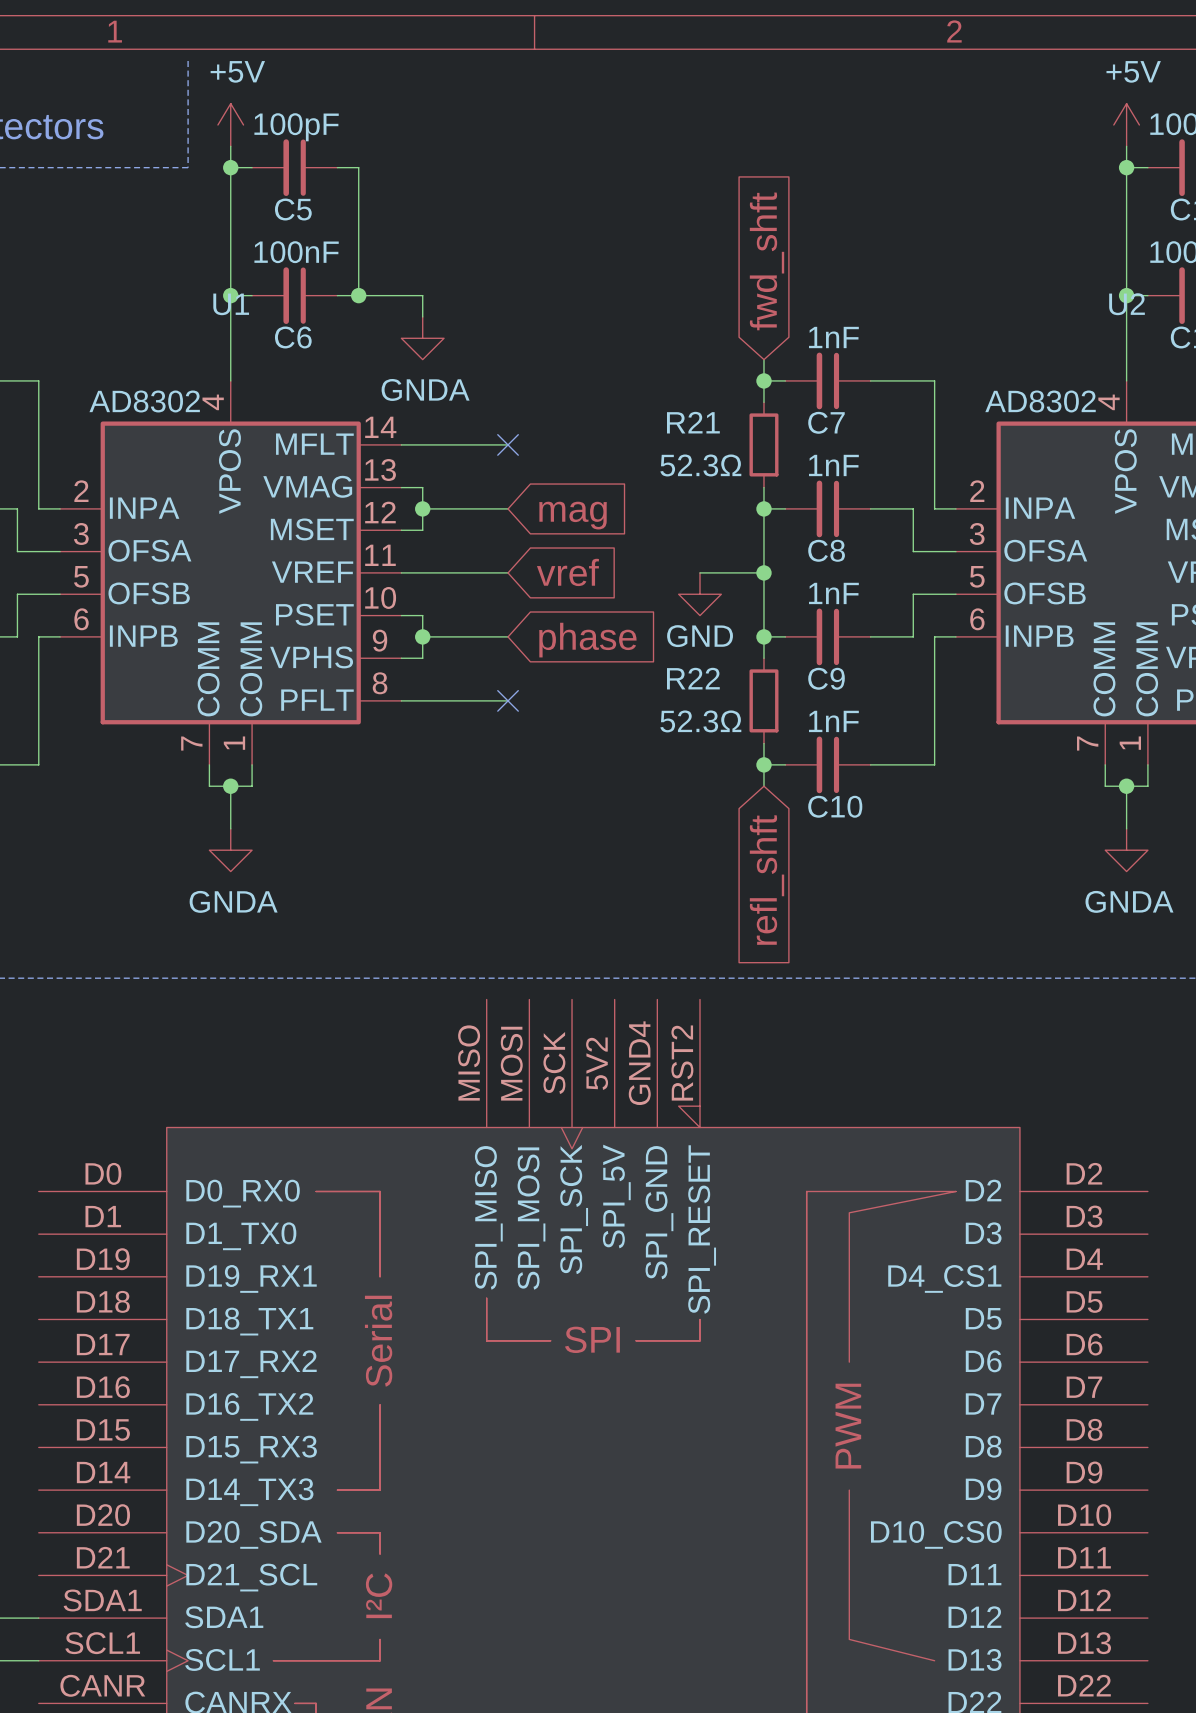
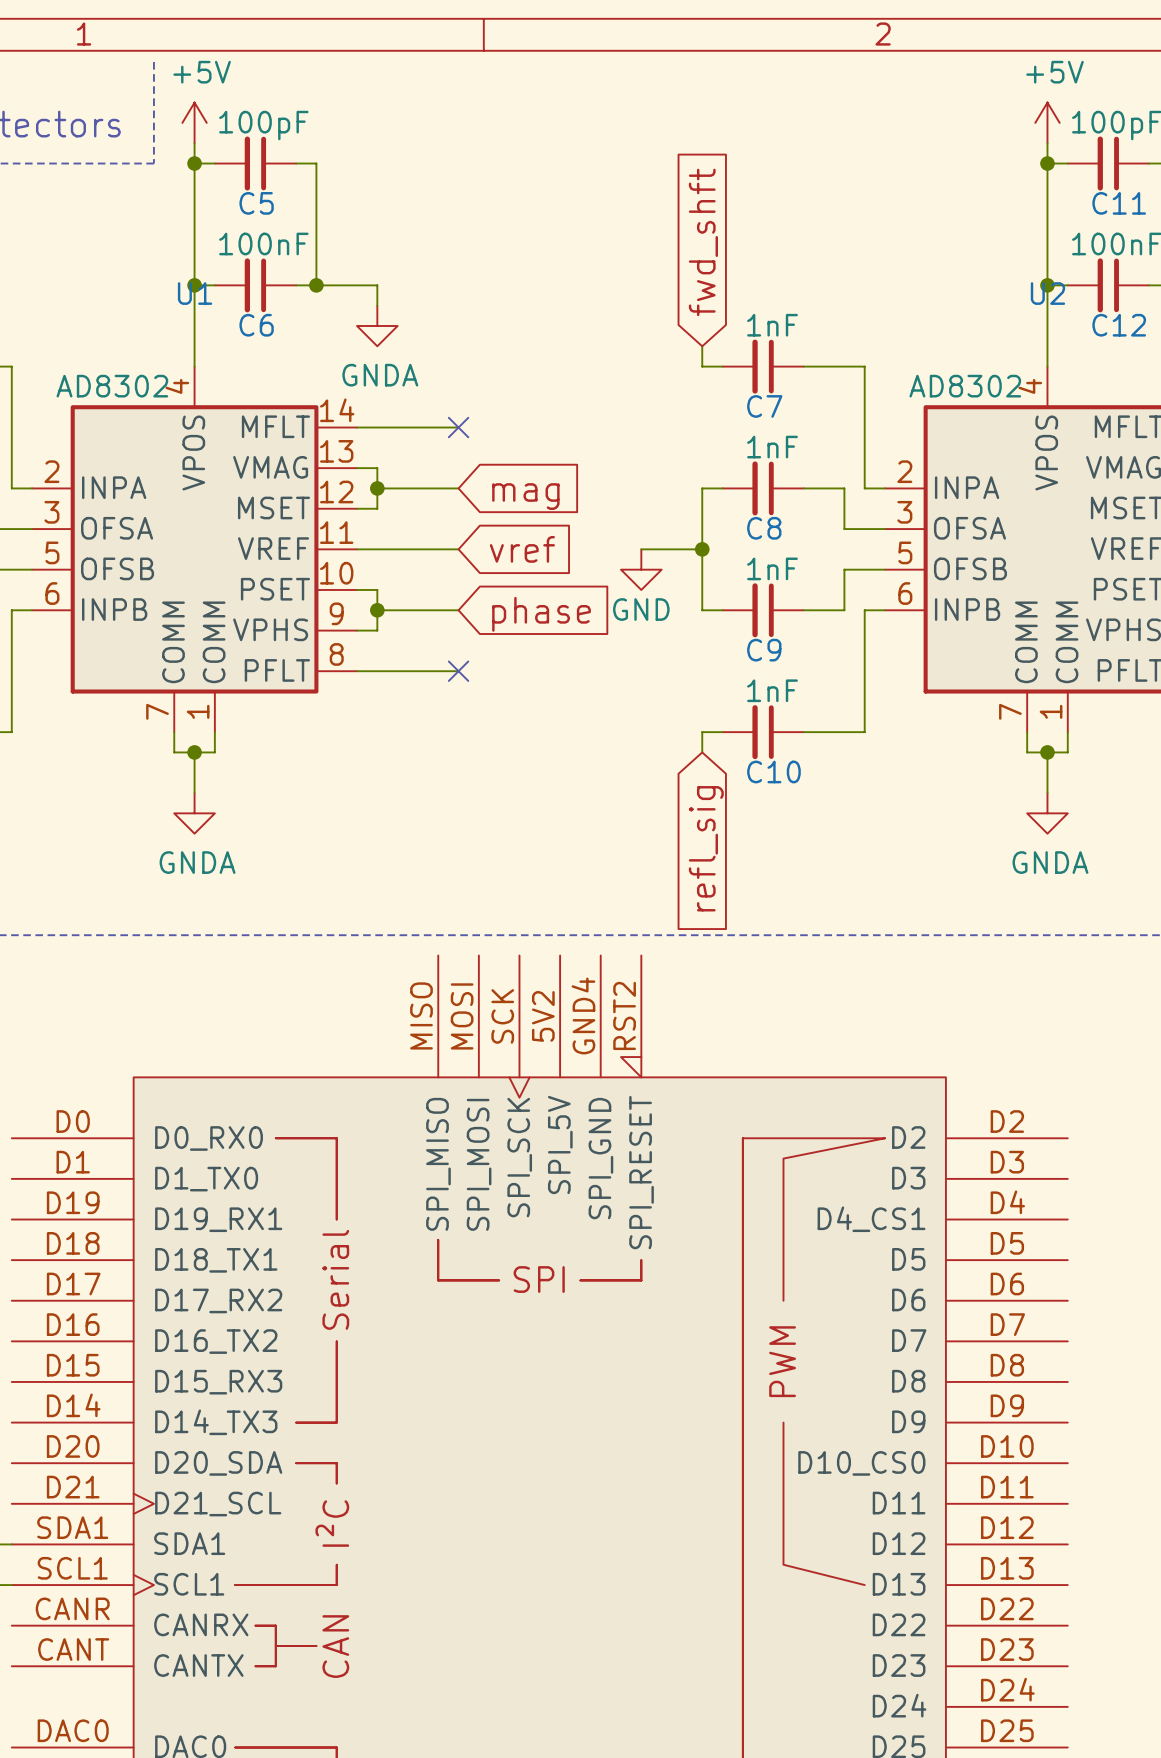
wire: (763, 380) (763, 402) -> none
junction: (763, 380) -> none
R21: 52.3Ω (763, 444) -> none
wire: (763, 487) (763, 508) -> none
junction: (763, 508) -> none
wire: (763, 636) (763, 658) -> none
junction: (763, 636) -> none
R22: 52.3Ω (763, 700) -> none
wire: (763, 743) (763, 764) -> none
junction: (763, 764) -> none
global label: refl_shft (767, 880) -> refl_sig (706, 848)

